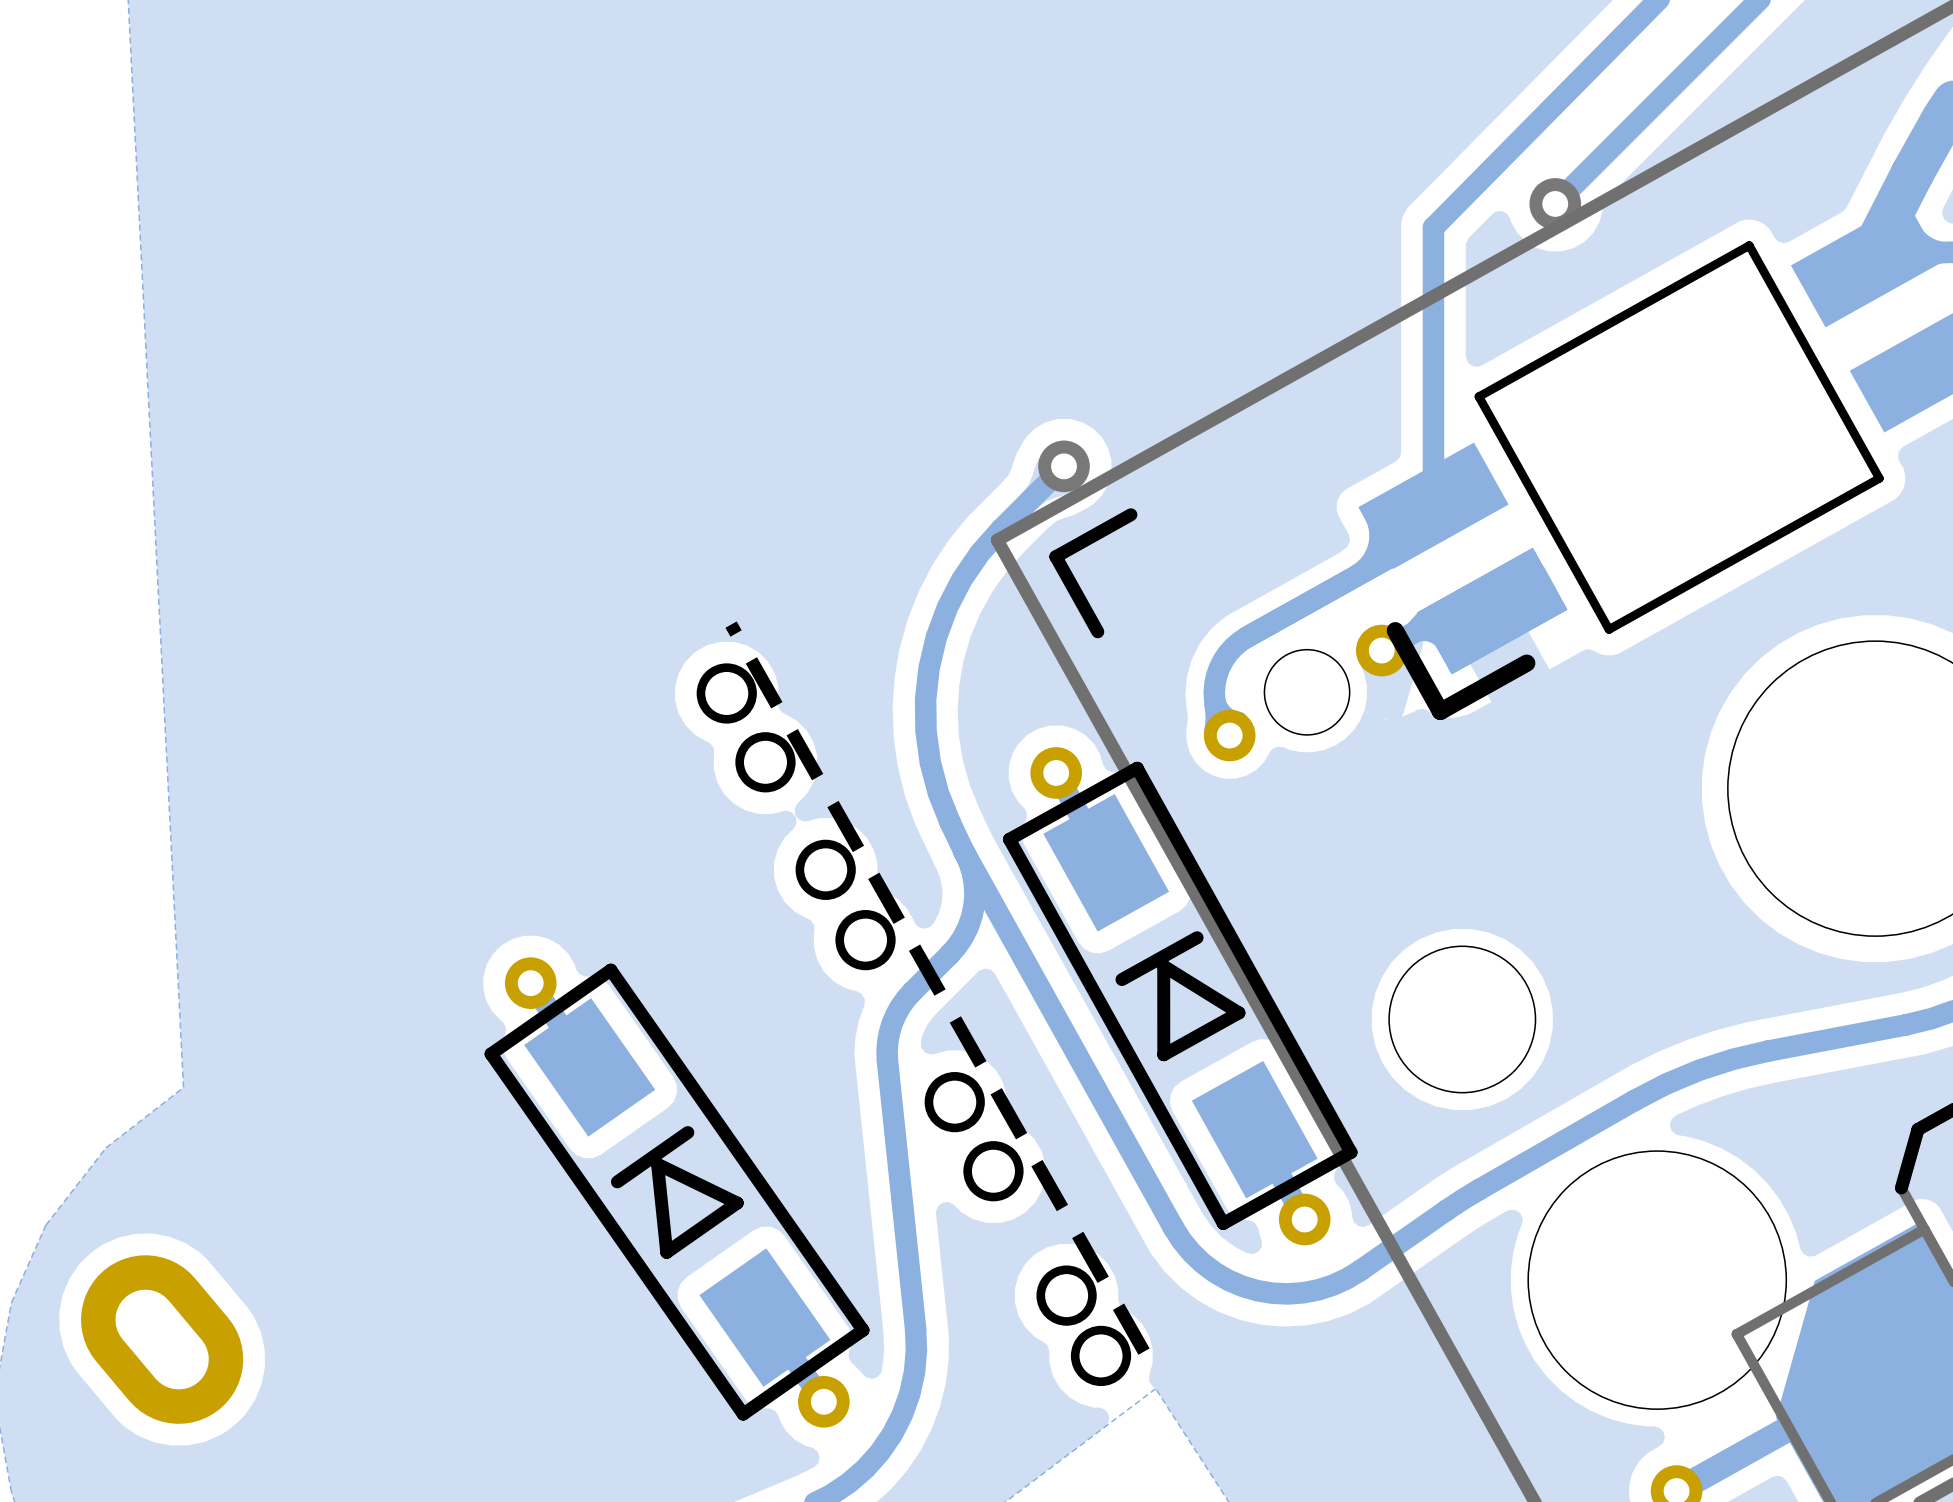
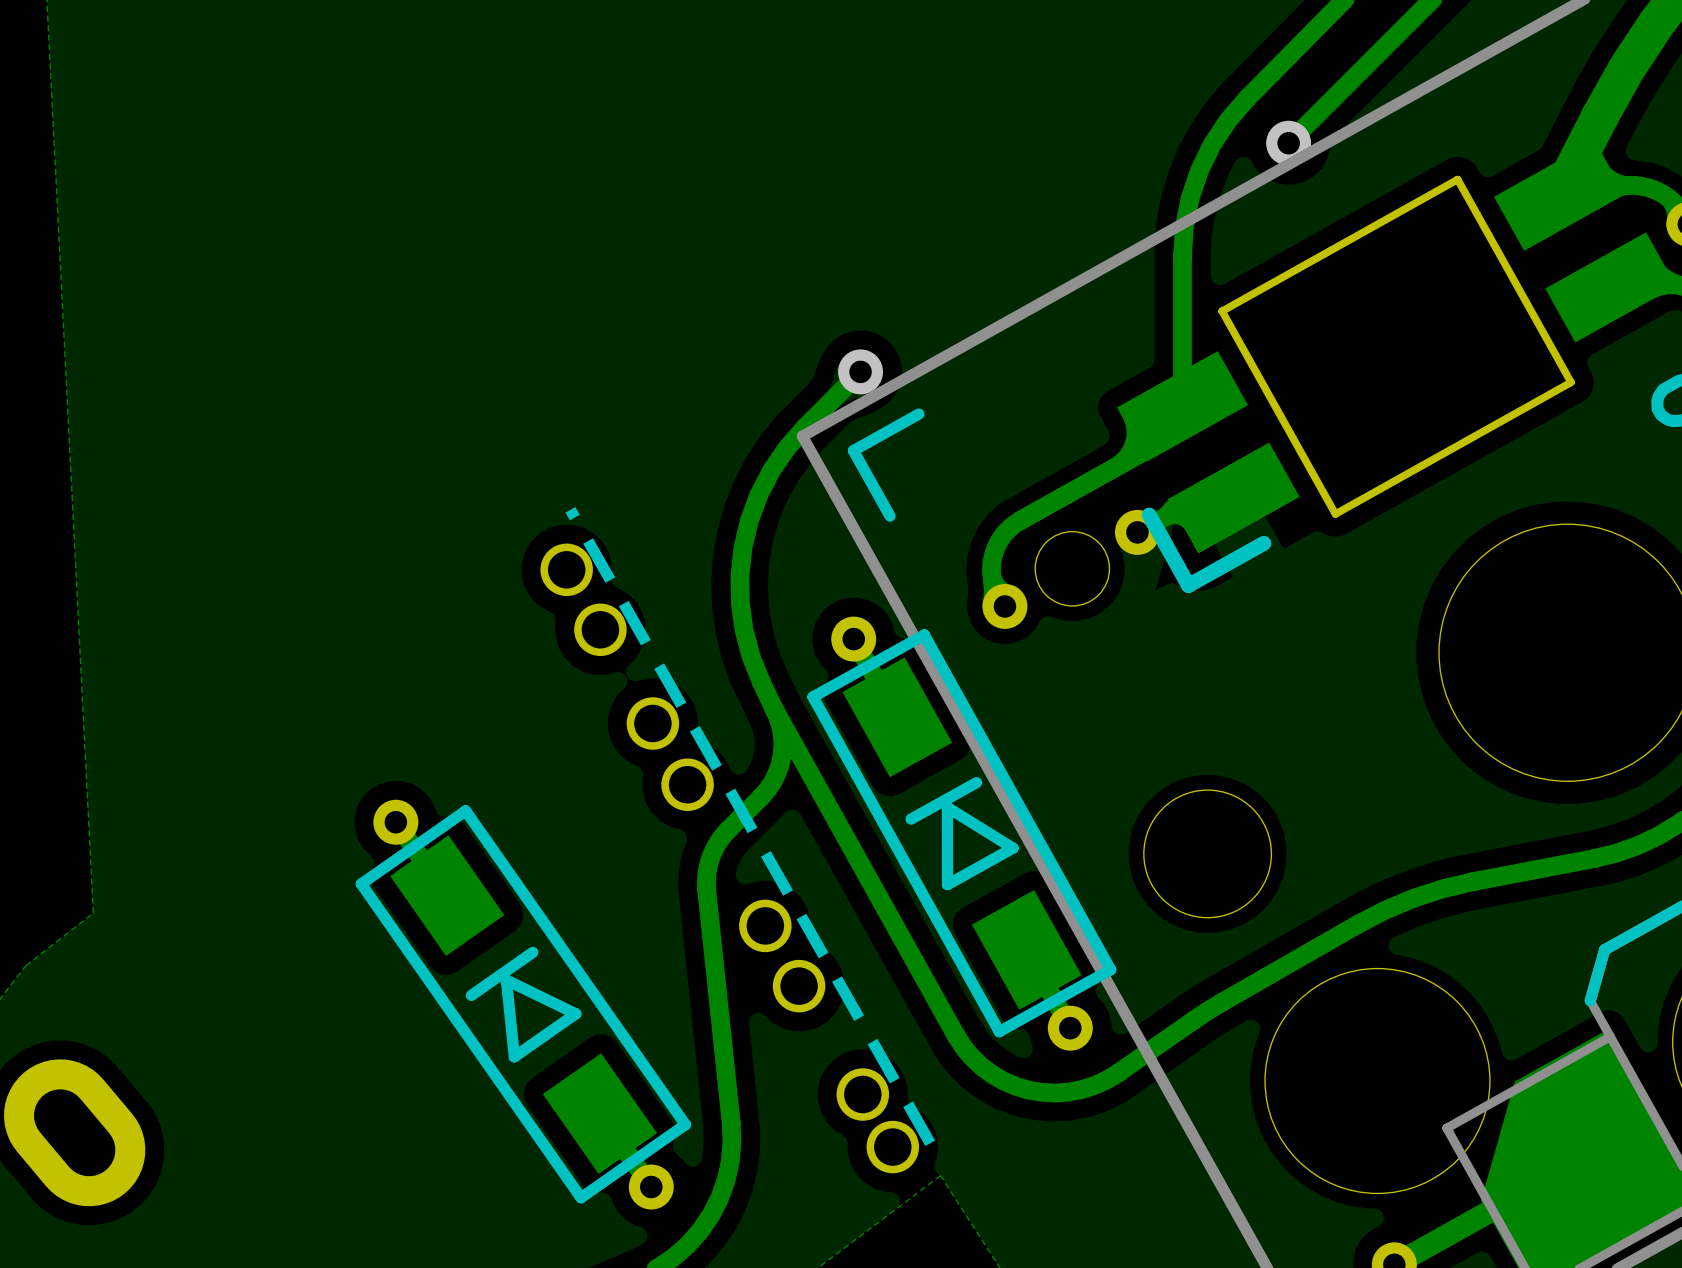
track: (1507, 152) (1433, 227) (1433, 333) -> (1247, 98) (1228, 120) (1212, 144) (1199, 170) (1190, 198) (1184, 227) (1182, 256)

